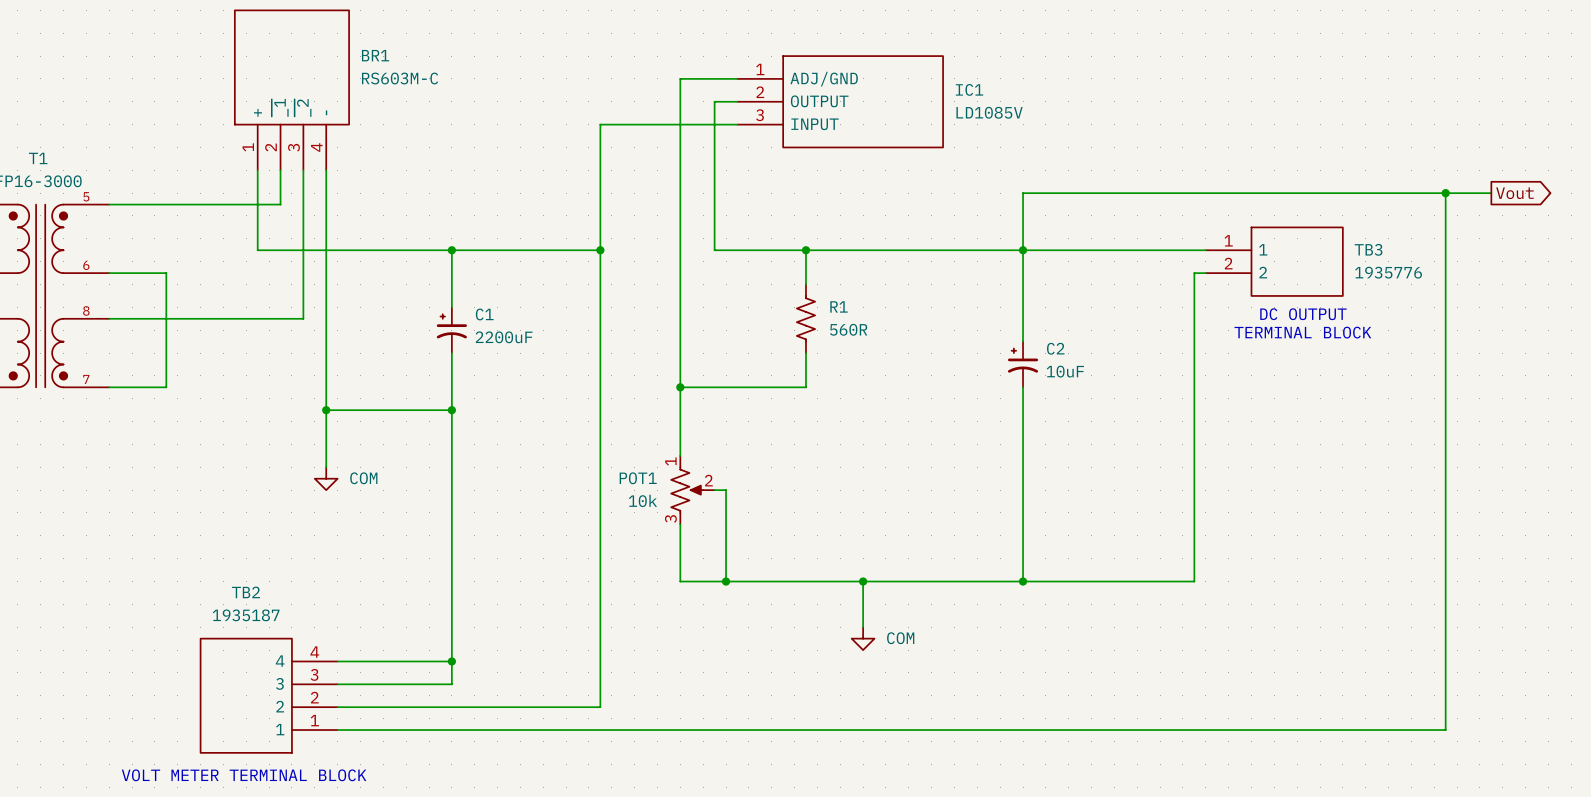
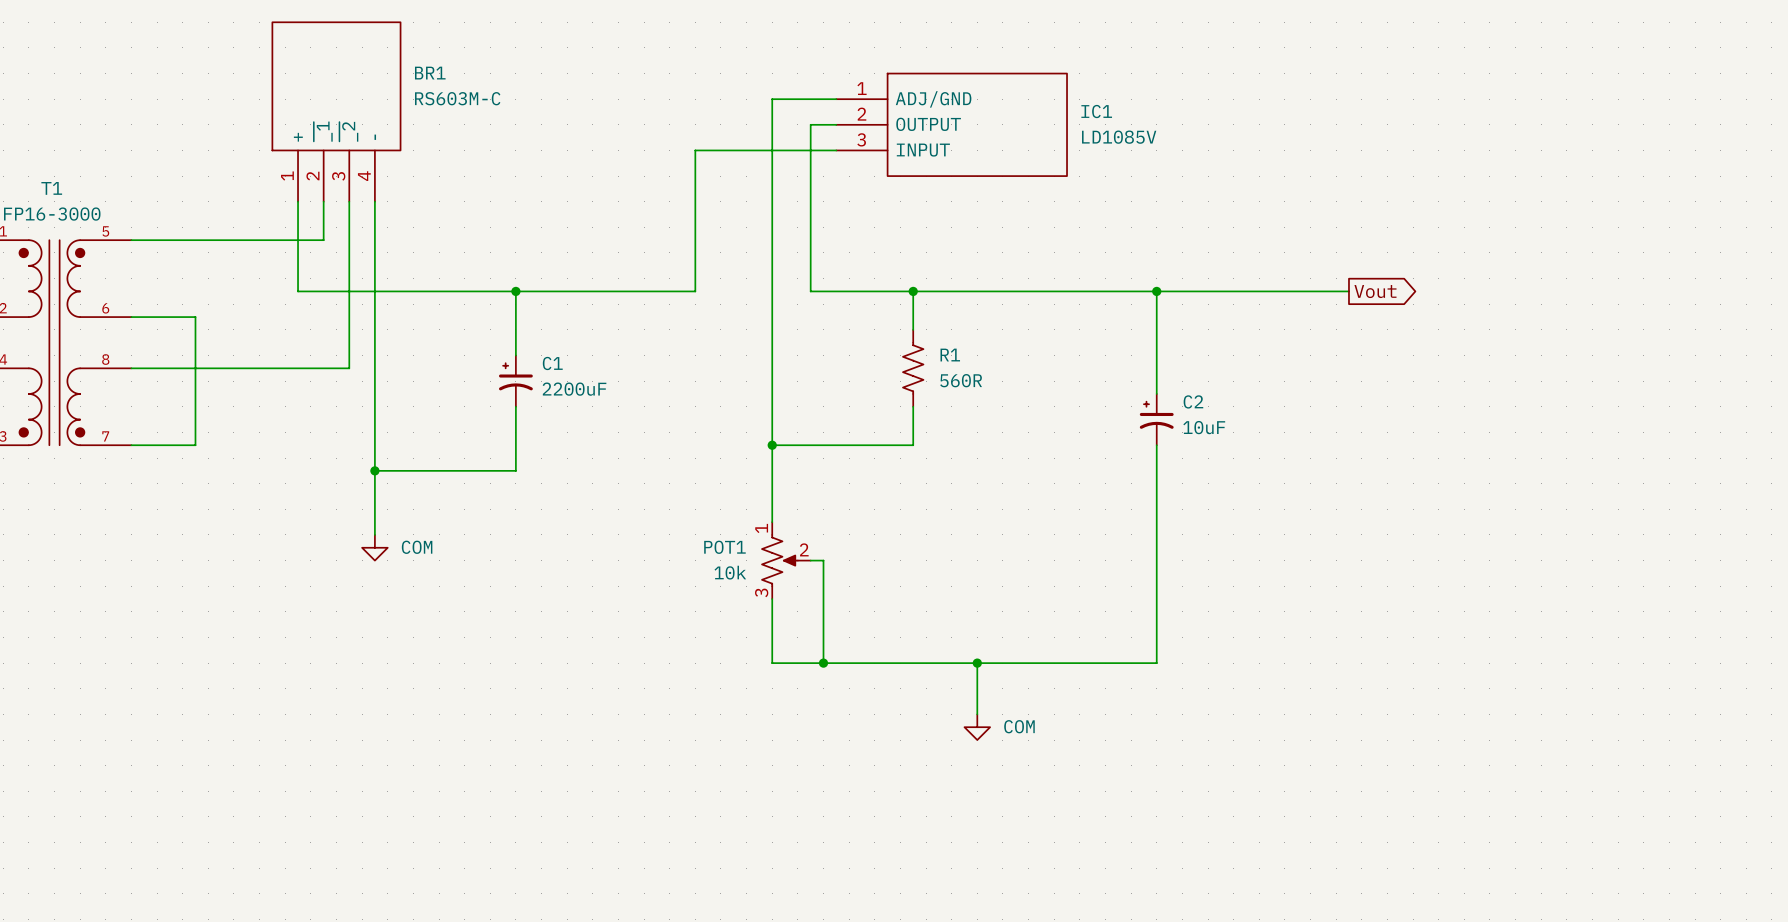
wire: (611, 124) (600, 124) (600, 707) (337, 707) -> (695, 150) (695, 291) (682, 291)
wire: (1445, 193) (1445, 730) (337, 730) -> none
junction: (1445, 193) -> none
wire: (1491, 193) (1023, 193) (1023, 250) -> none
global label: Vout (1514, 193) -> none
junction: (600, 250) -> none
wire: (1194, 250) (1205, 250) -> none
global label: none -> Vout (1375, 291)
TB3: 1935776 (1274, 261) -> none
wire: (1205, 273) (1194, 273) (1194, 581) (1023, 581) -> none
text: DC OUTPUT (1303, 314) -> none
text: TERMINAL BLOCK (1302, 332) -> none
wire: (451, 410) (451, 684) (337, 684) -> none
junction: (451, 410) -> none
junction: (1023, 581) -> none
wire: (337, 661) (451, 661) -> none
junction: (451, 661) -> none
TB2: 1935187 (268, 695) -> none
text: VOLT METER TERMINAL BLOCK (244, 775) -> none

